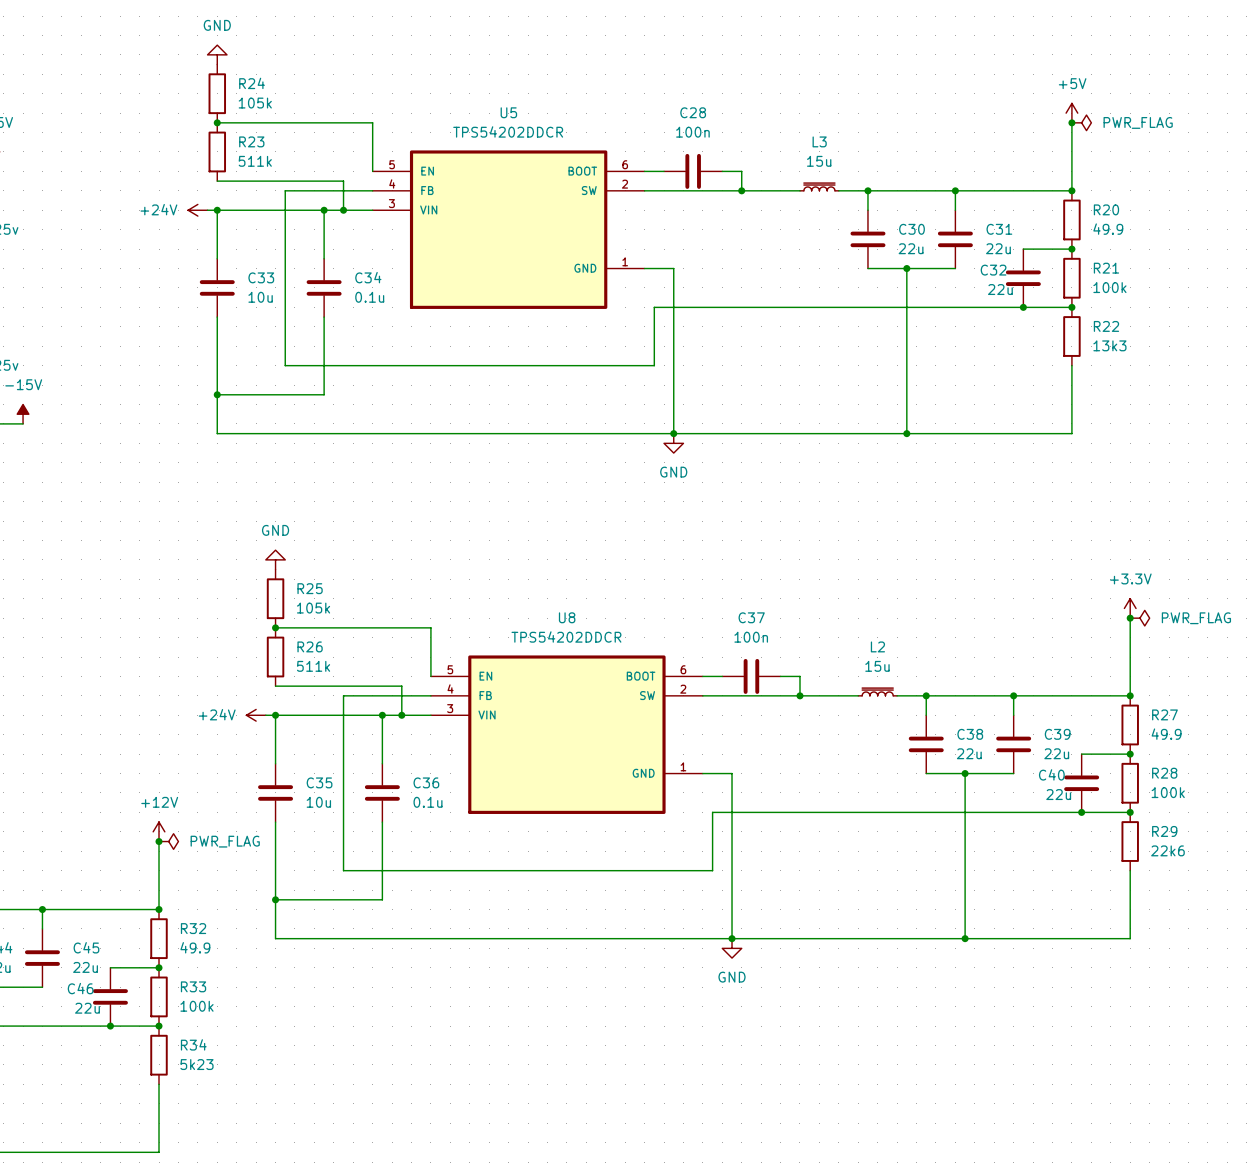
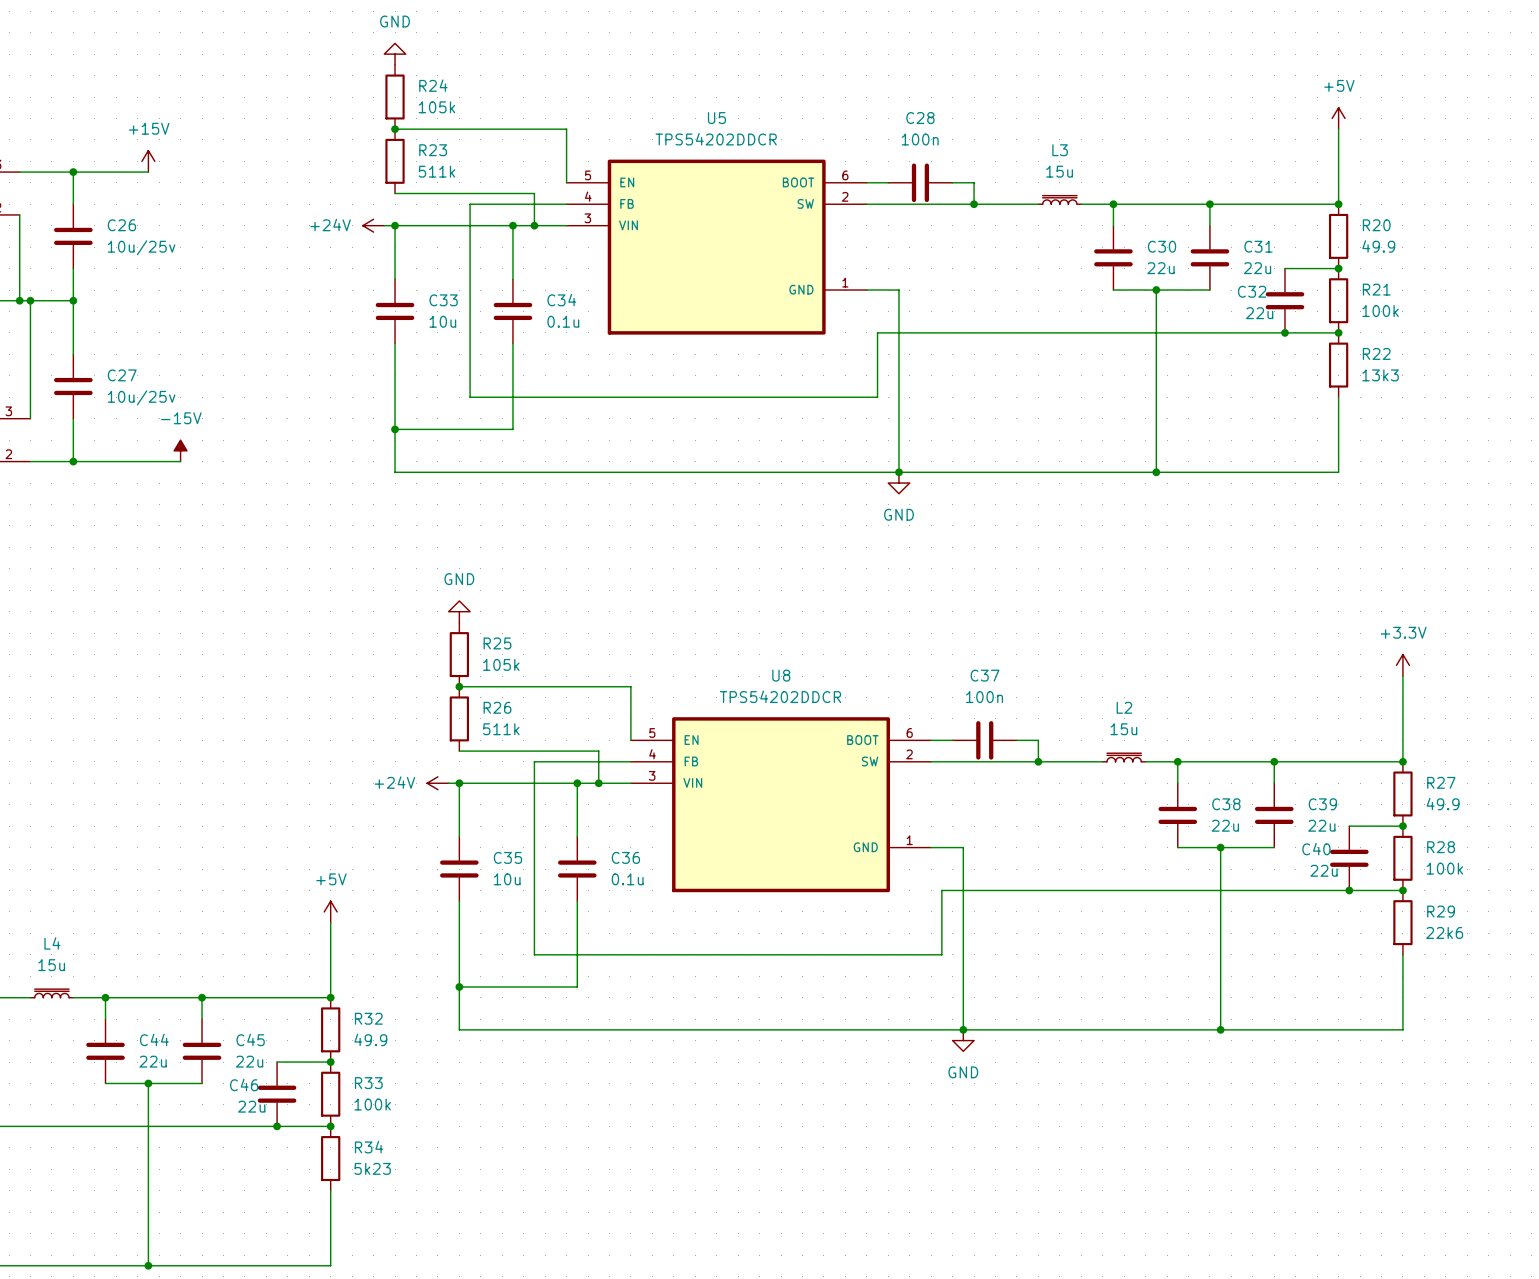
junction: (1071, 122) -> none
power symbol: PWR_FLAG (1081, 122) -> none
junction: (1130, 618) -> none
power symbol: PWR_FLAG (1139, 618) -> none
power symbol: +12V (159, 831) -> +5V (330, 911)
junction: (159, 841) -> none
power symbol: PWR_FLAG (168, 841) -> none

